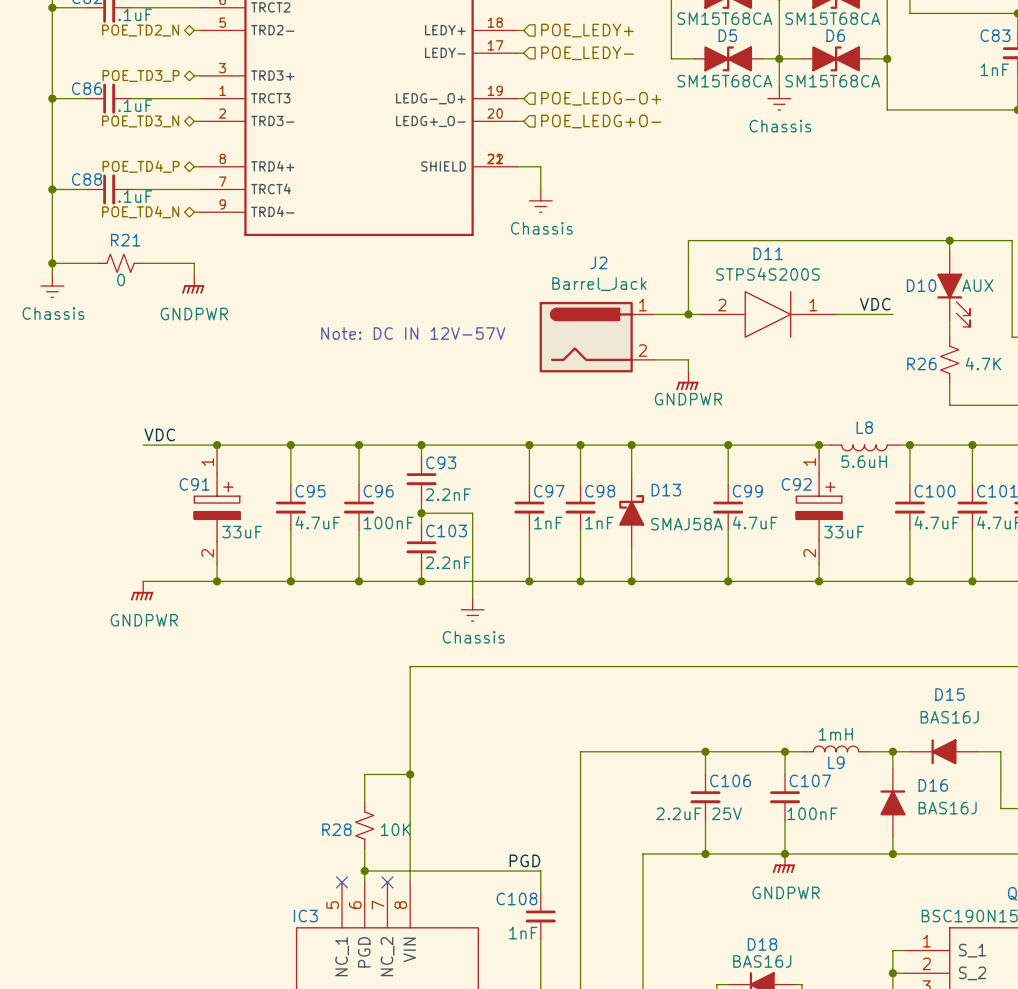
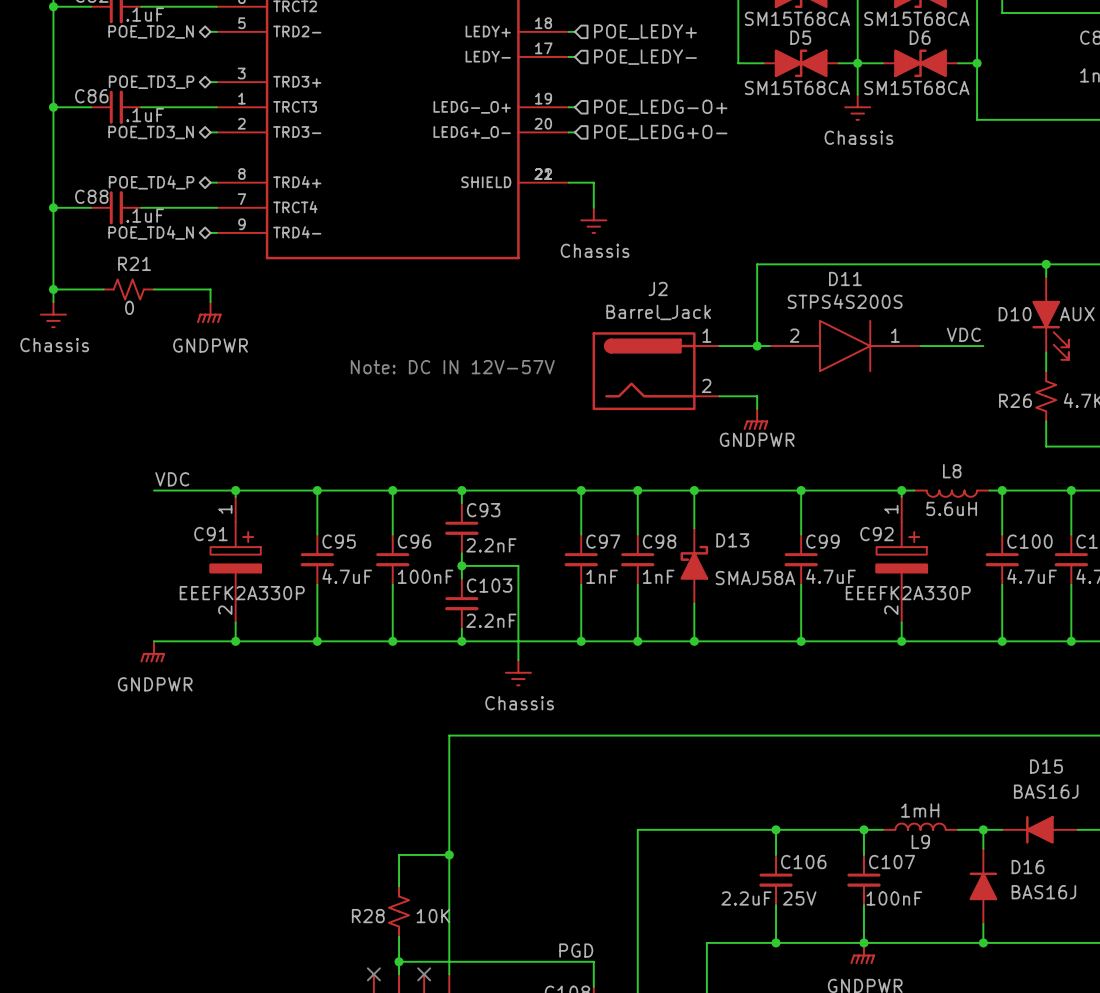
C91 value: 33uF (242, 532) -> EEEFK2A330P (242, 593)
C92 value: 33uF (844, 532) -> EEEFK2A330P (908, 593)

